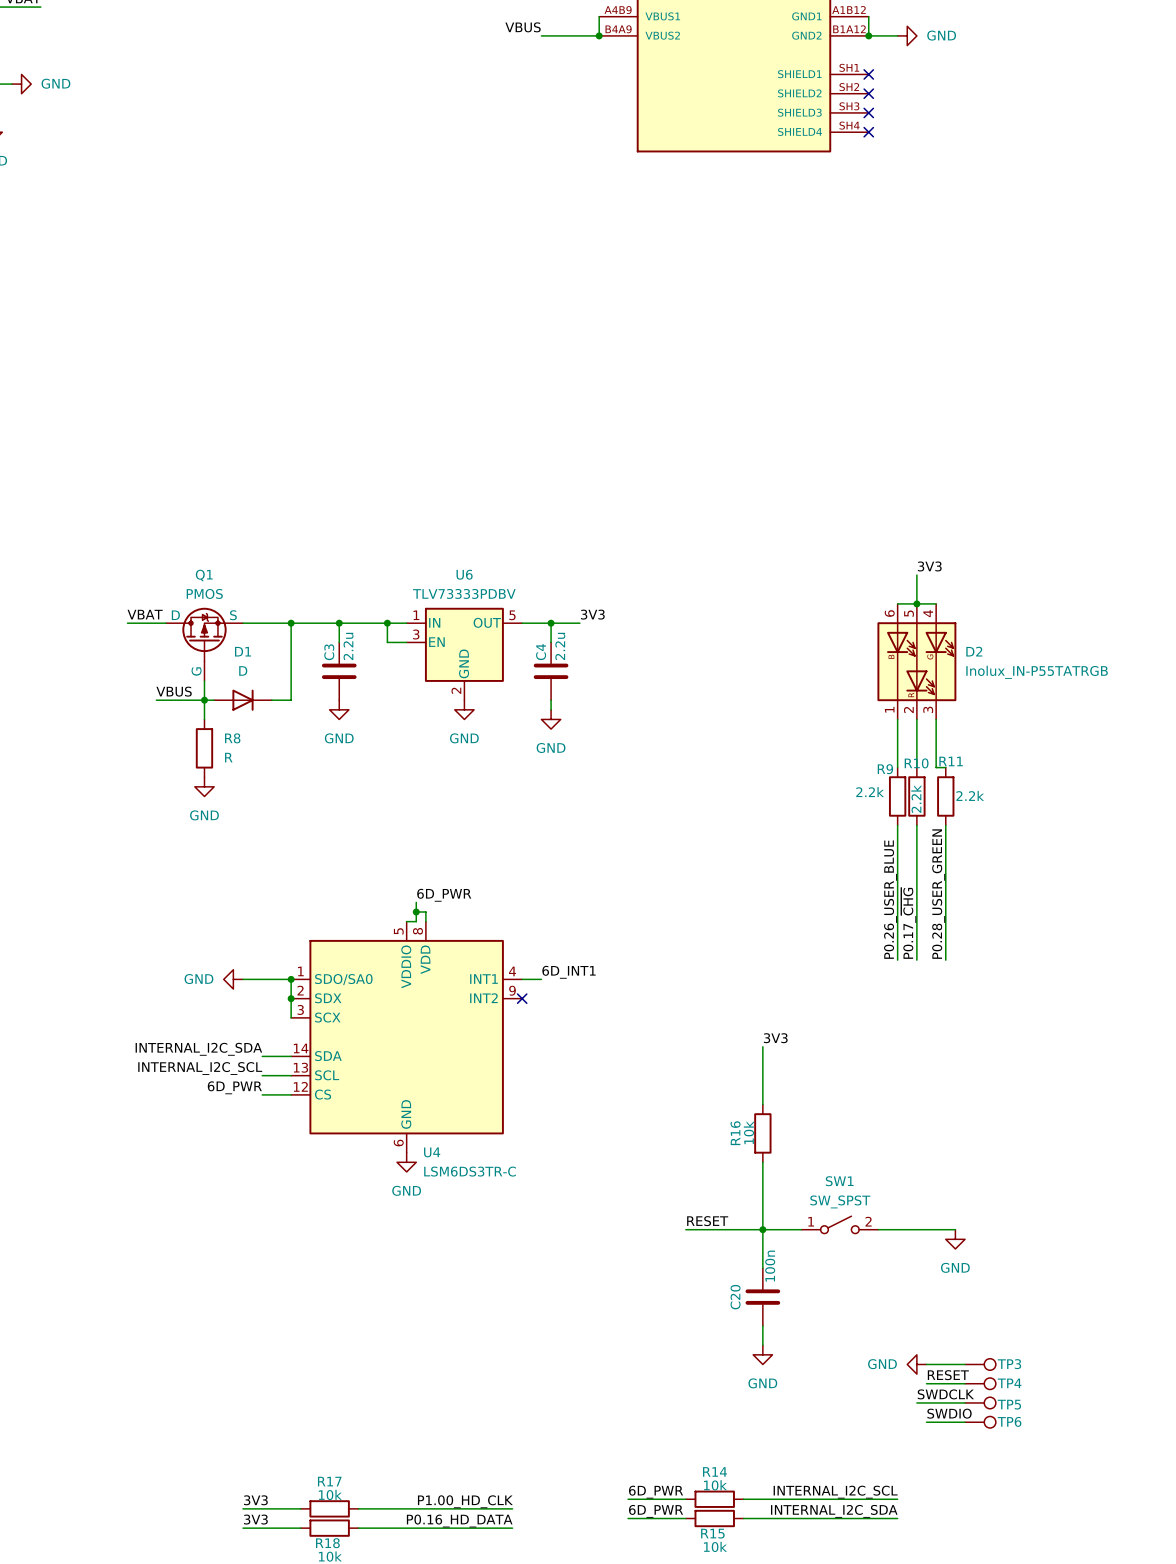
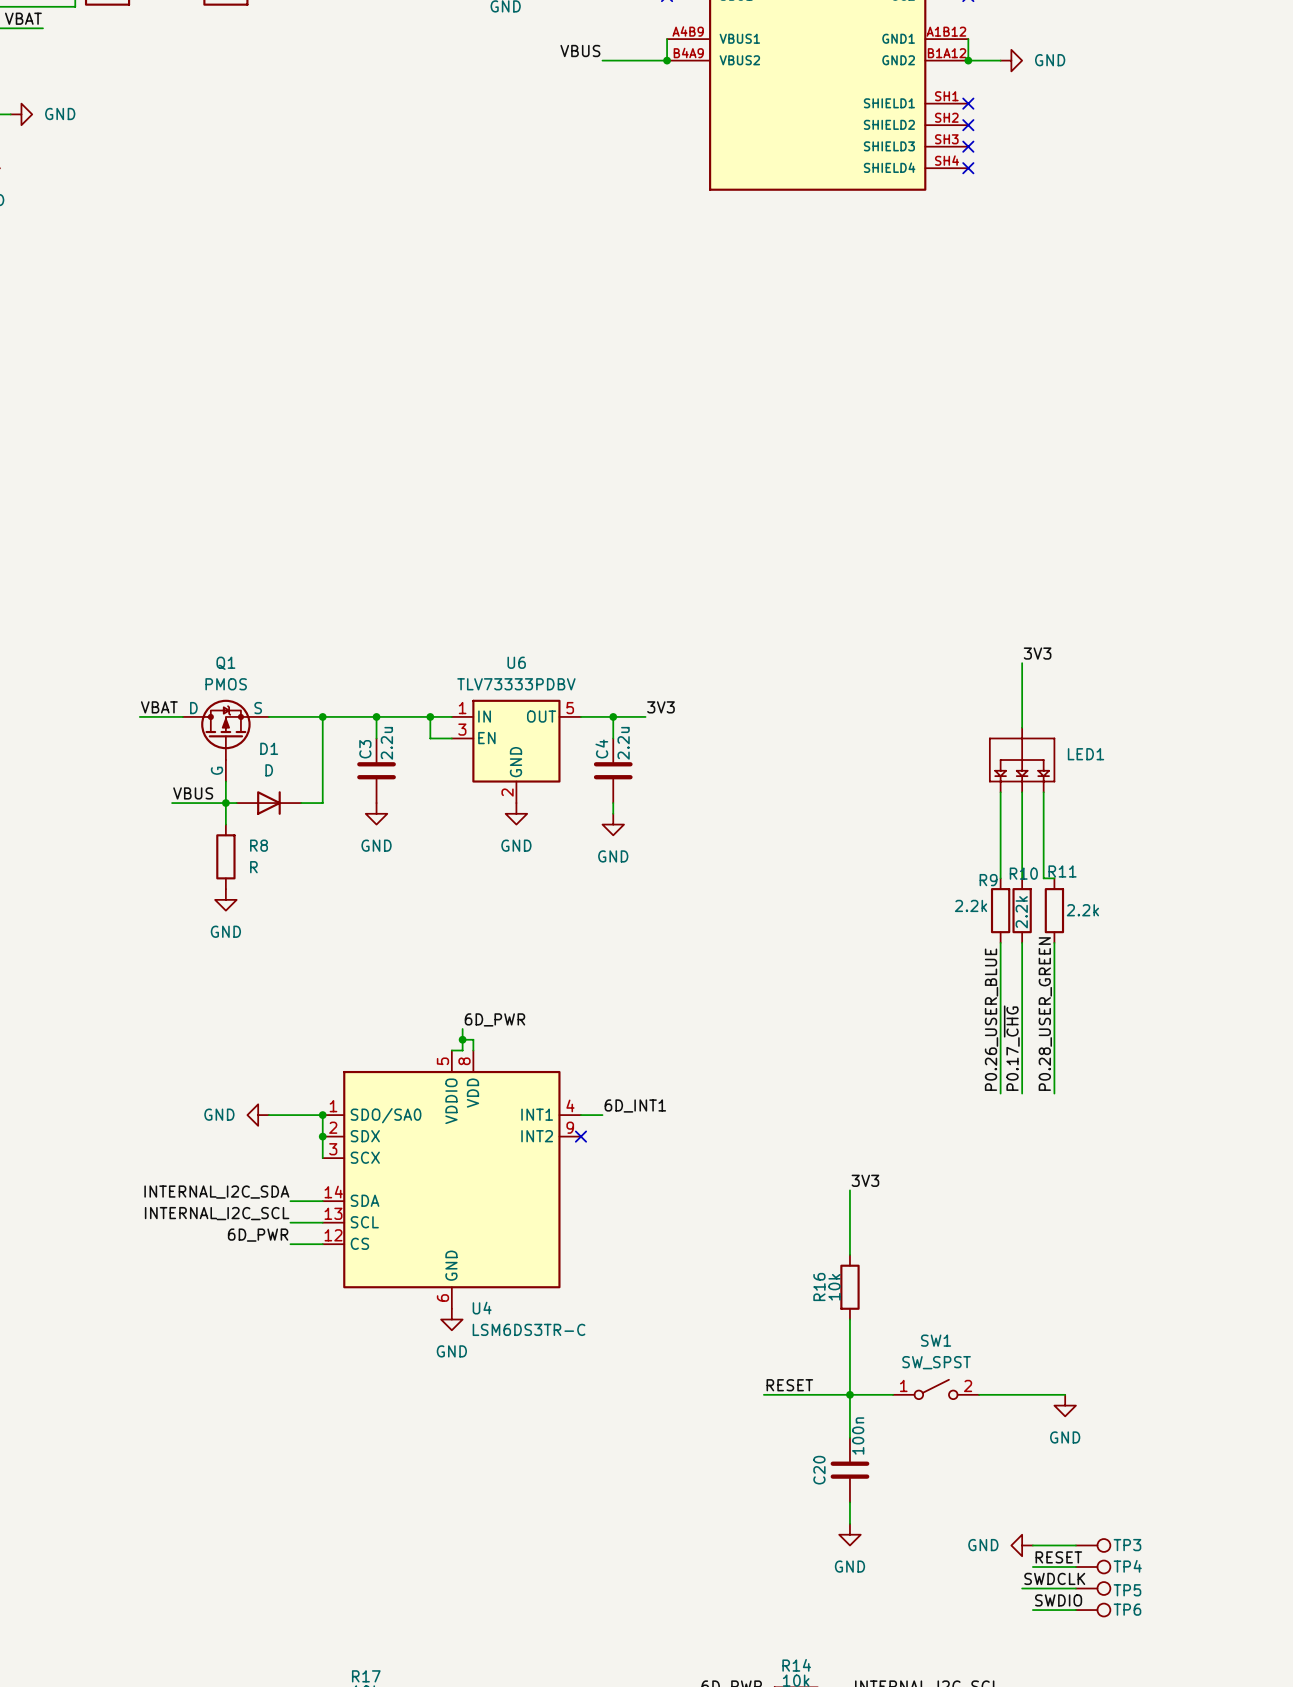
wire: (897, 603) (936, 603) -> none
junction: (916, 603) -> none
D2: Inolux_IN-P55TATRGB (916, 661) -> none
LED1: none -> (1022, 760)

